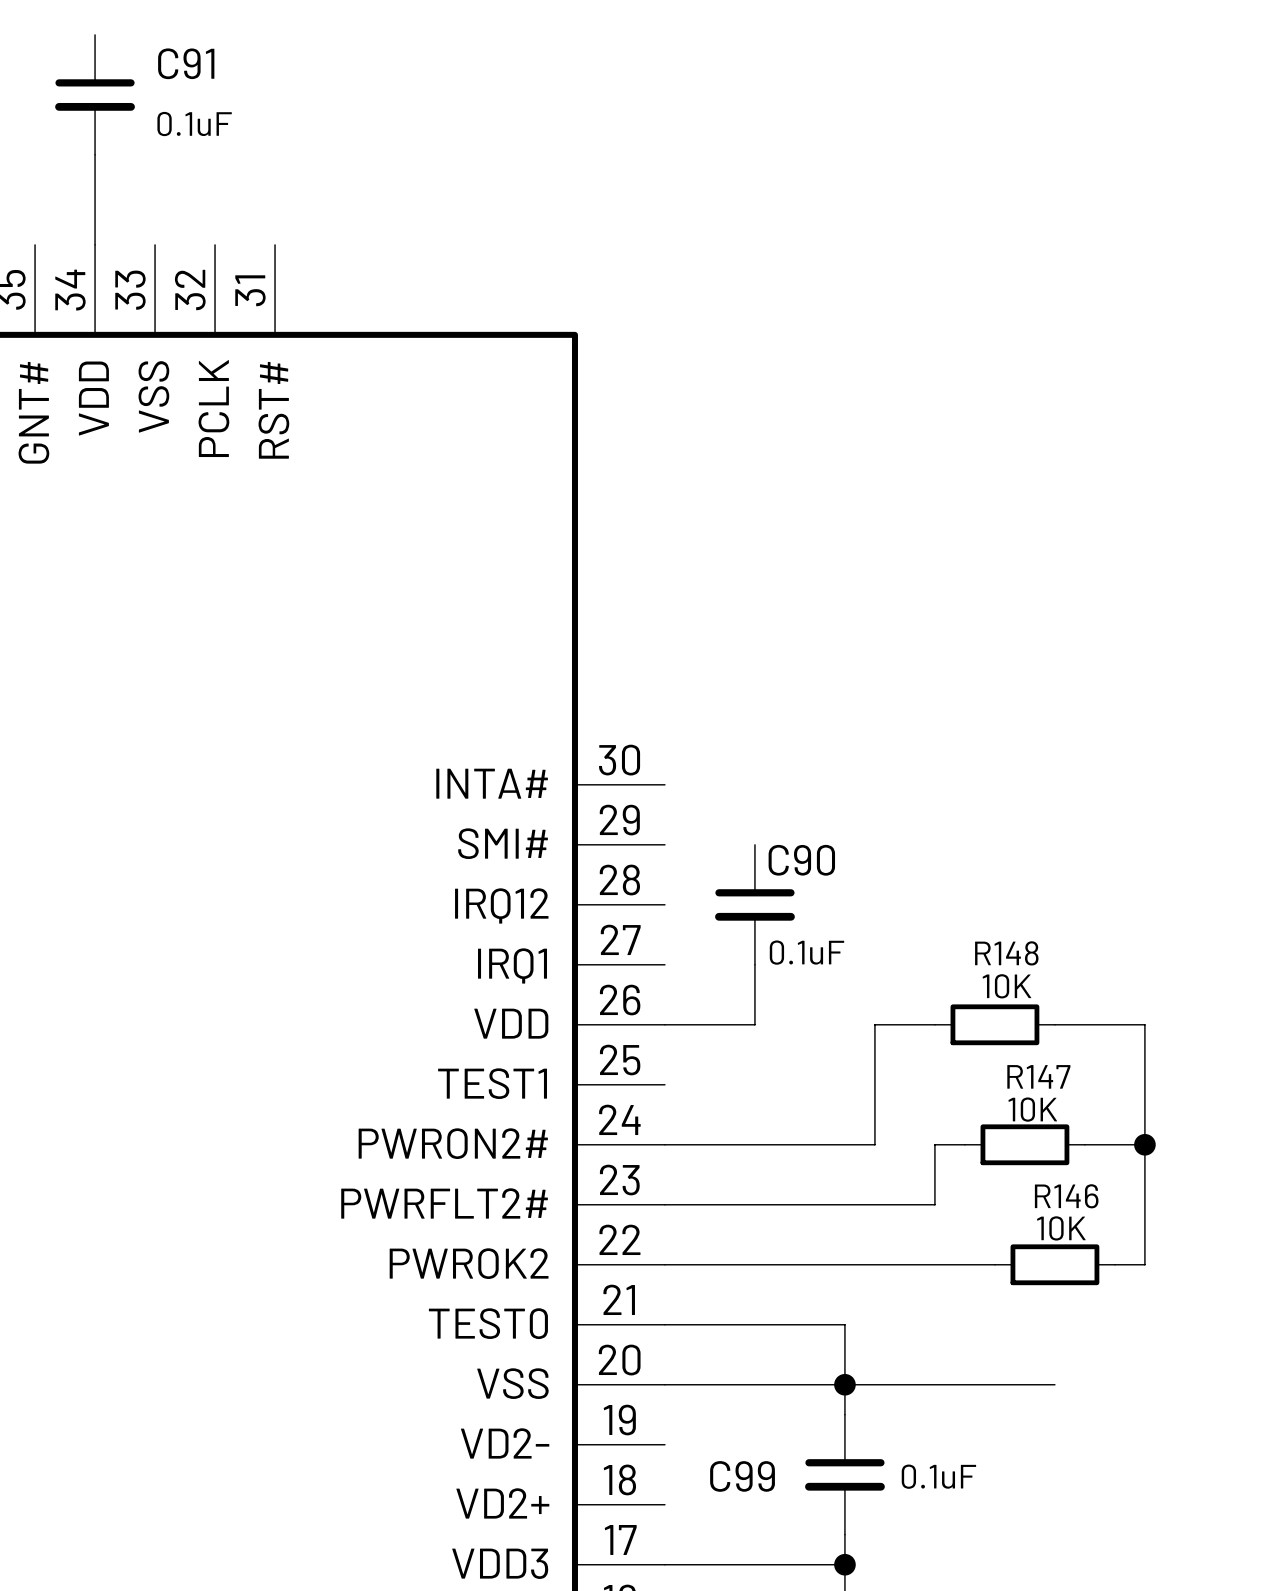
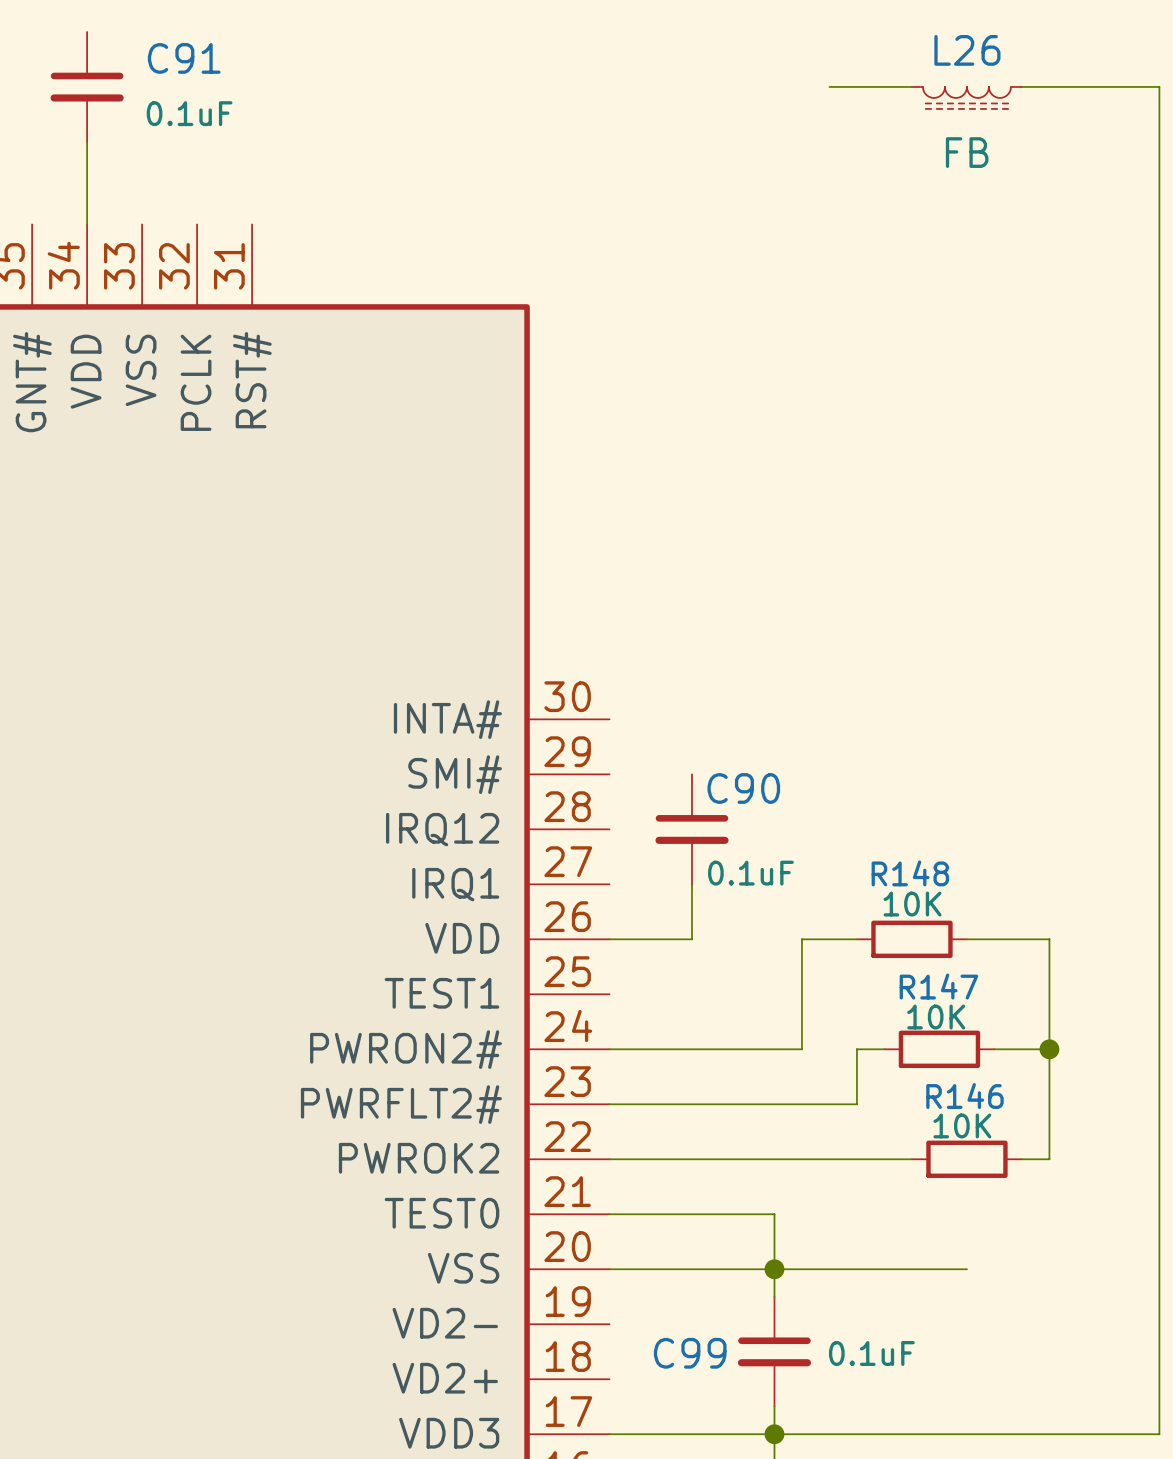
wire: none -> (829, 86) (911, 86)
wire: none -> (1021, 86) (1159, 86) (1159, 1434) (774, 1434)
L26: none -> FB (966, 97)

